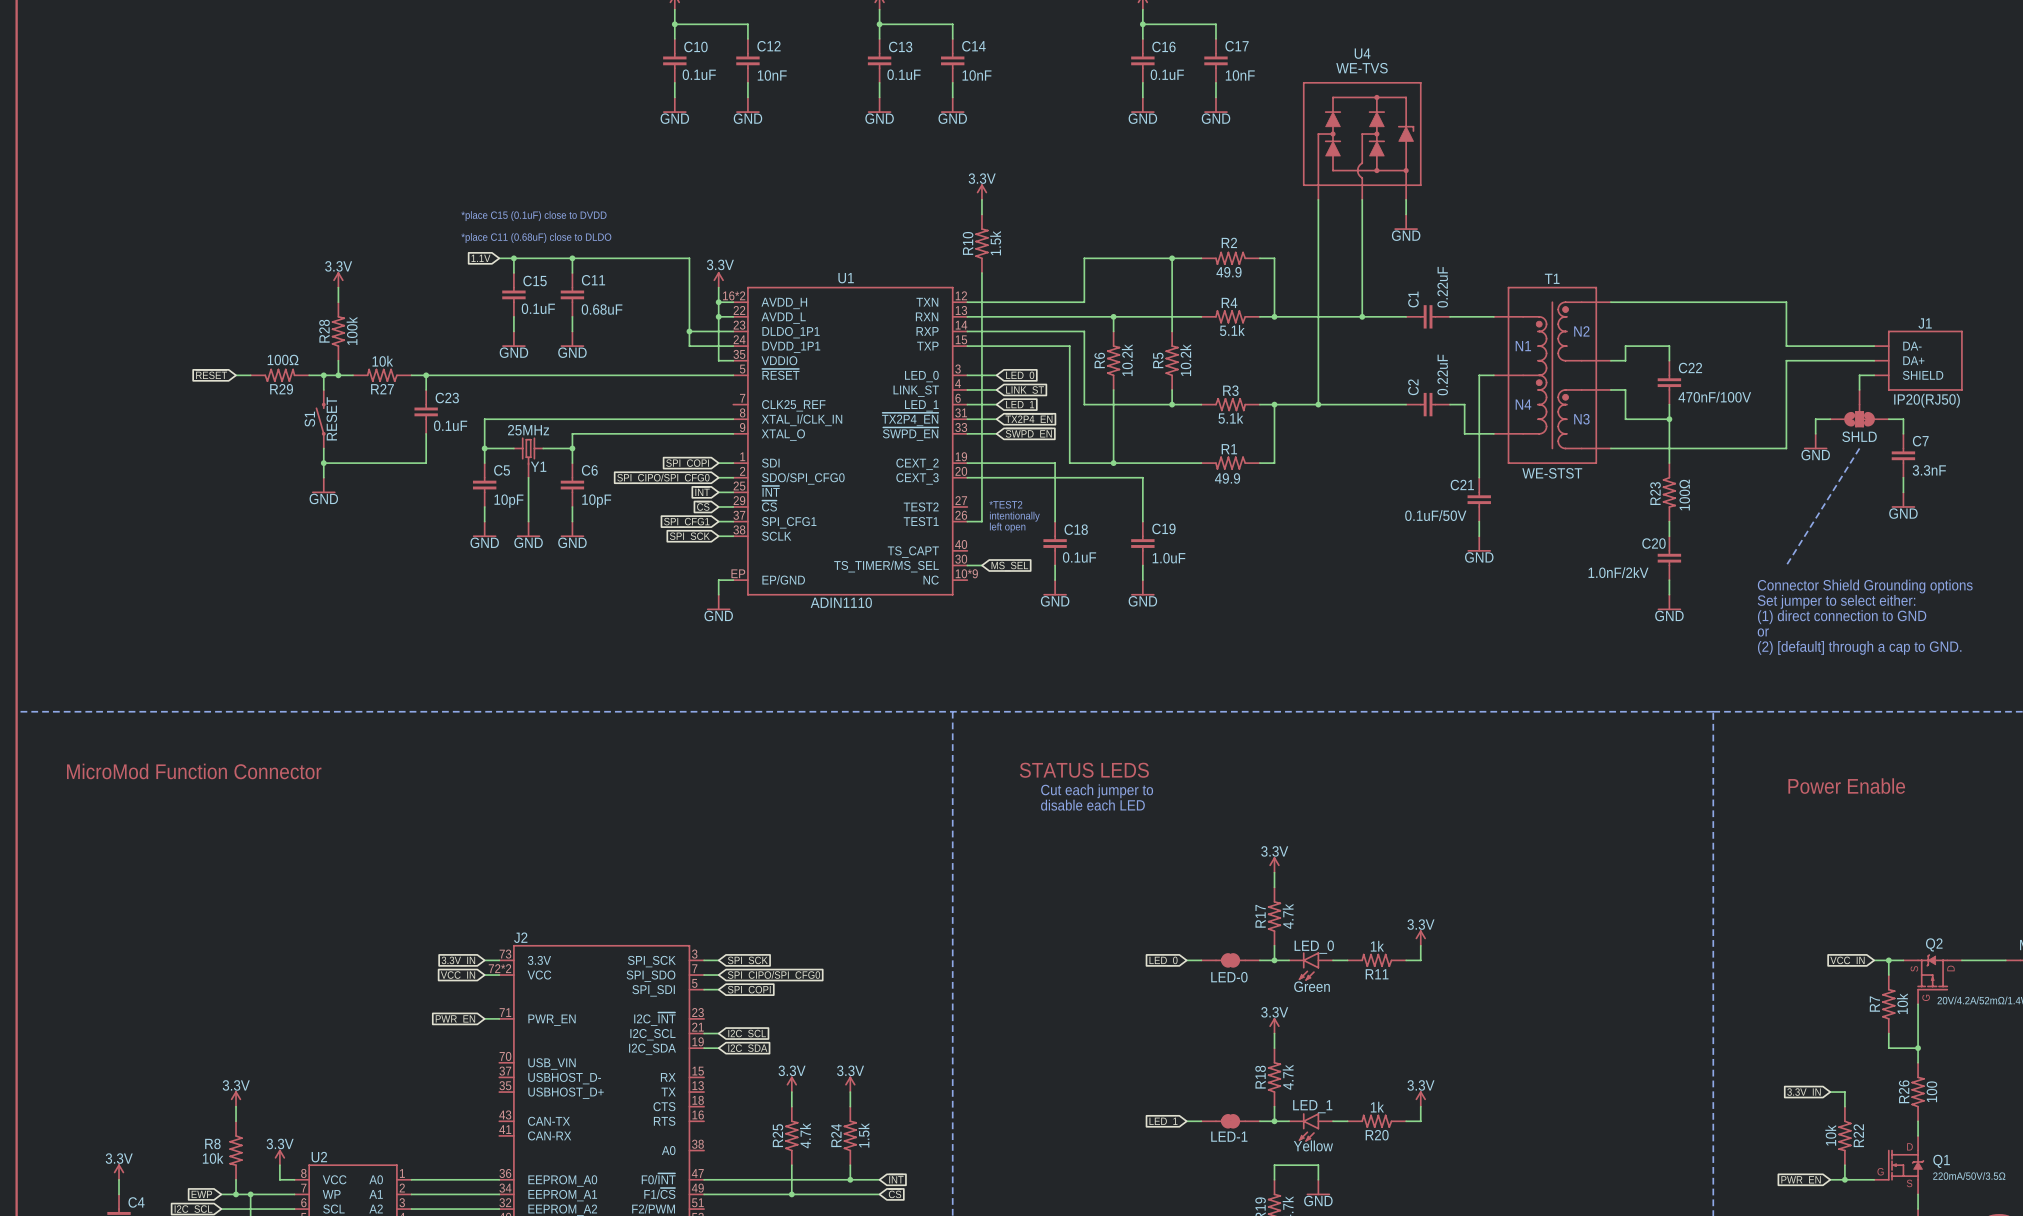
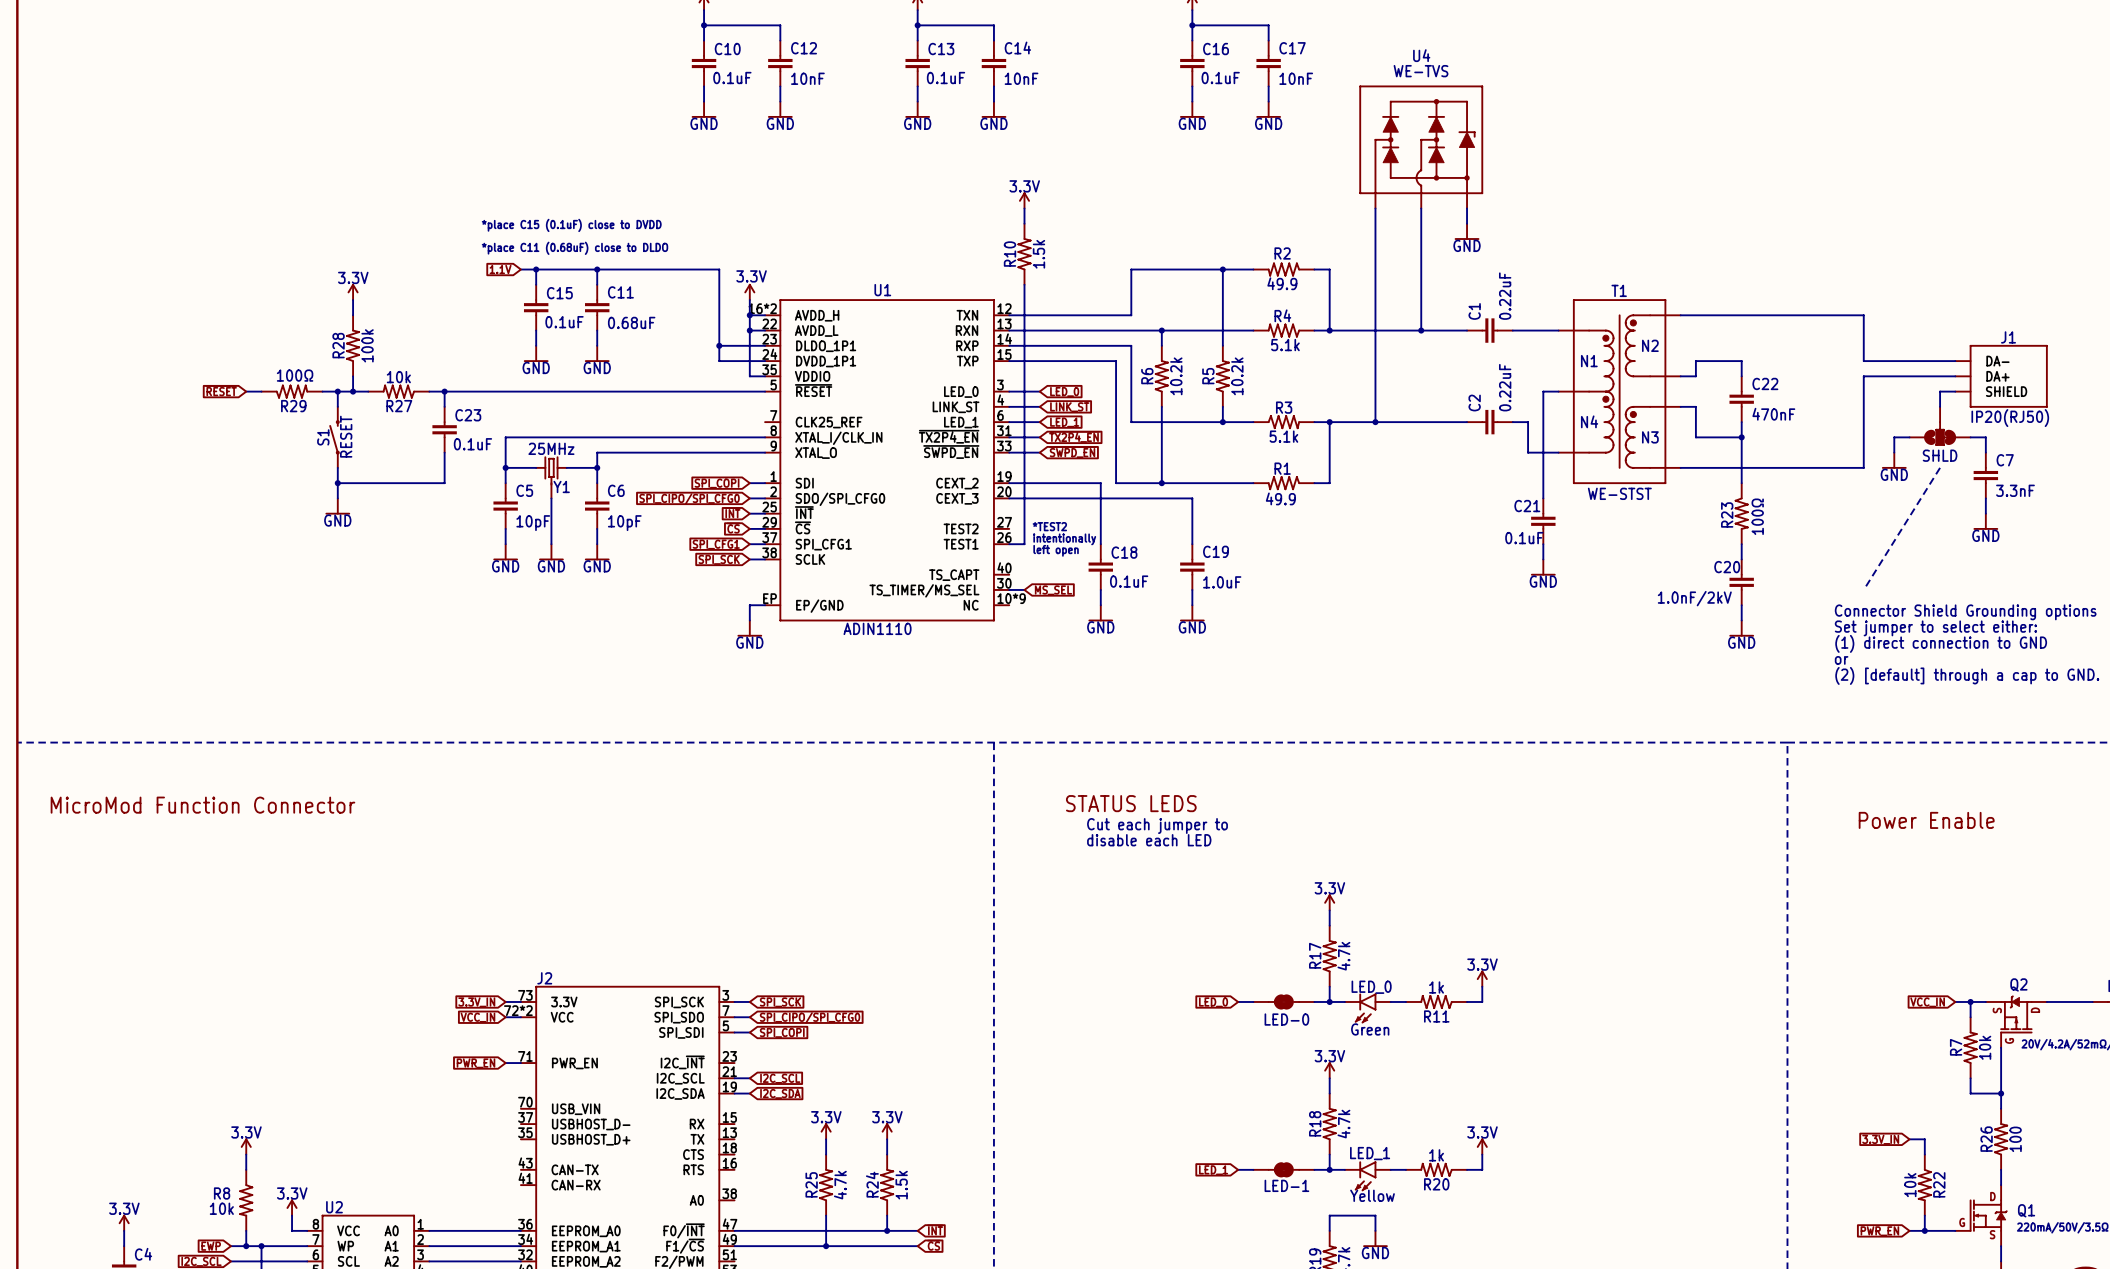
C22 value: 470nF/100V (1714, 397) -> 470nF (1773, 414)
C21 value: 0.1uF/50V (1435, 515) -> 0.1uF (1524, 538)

